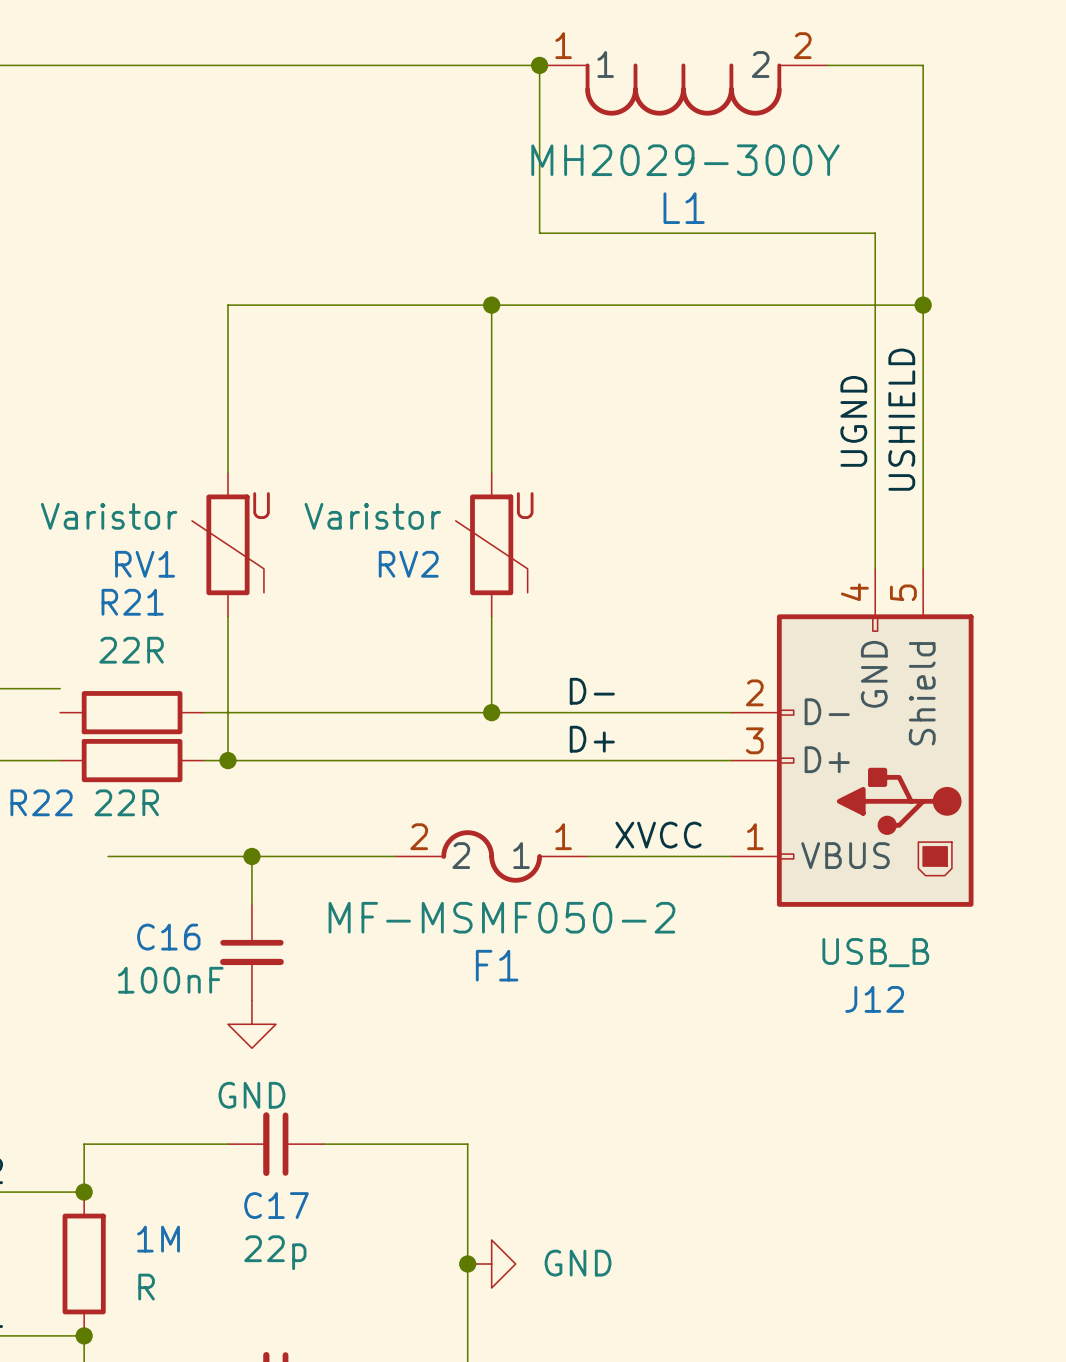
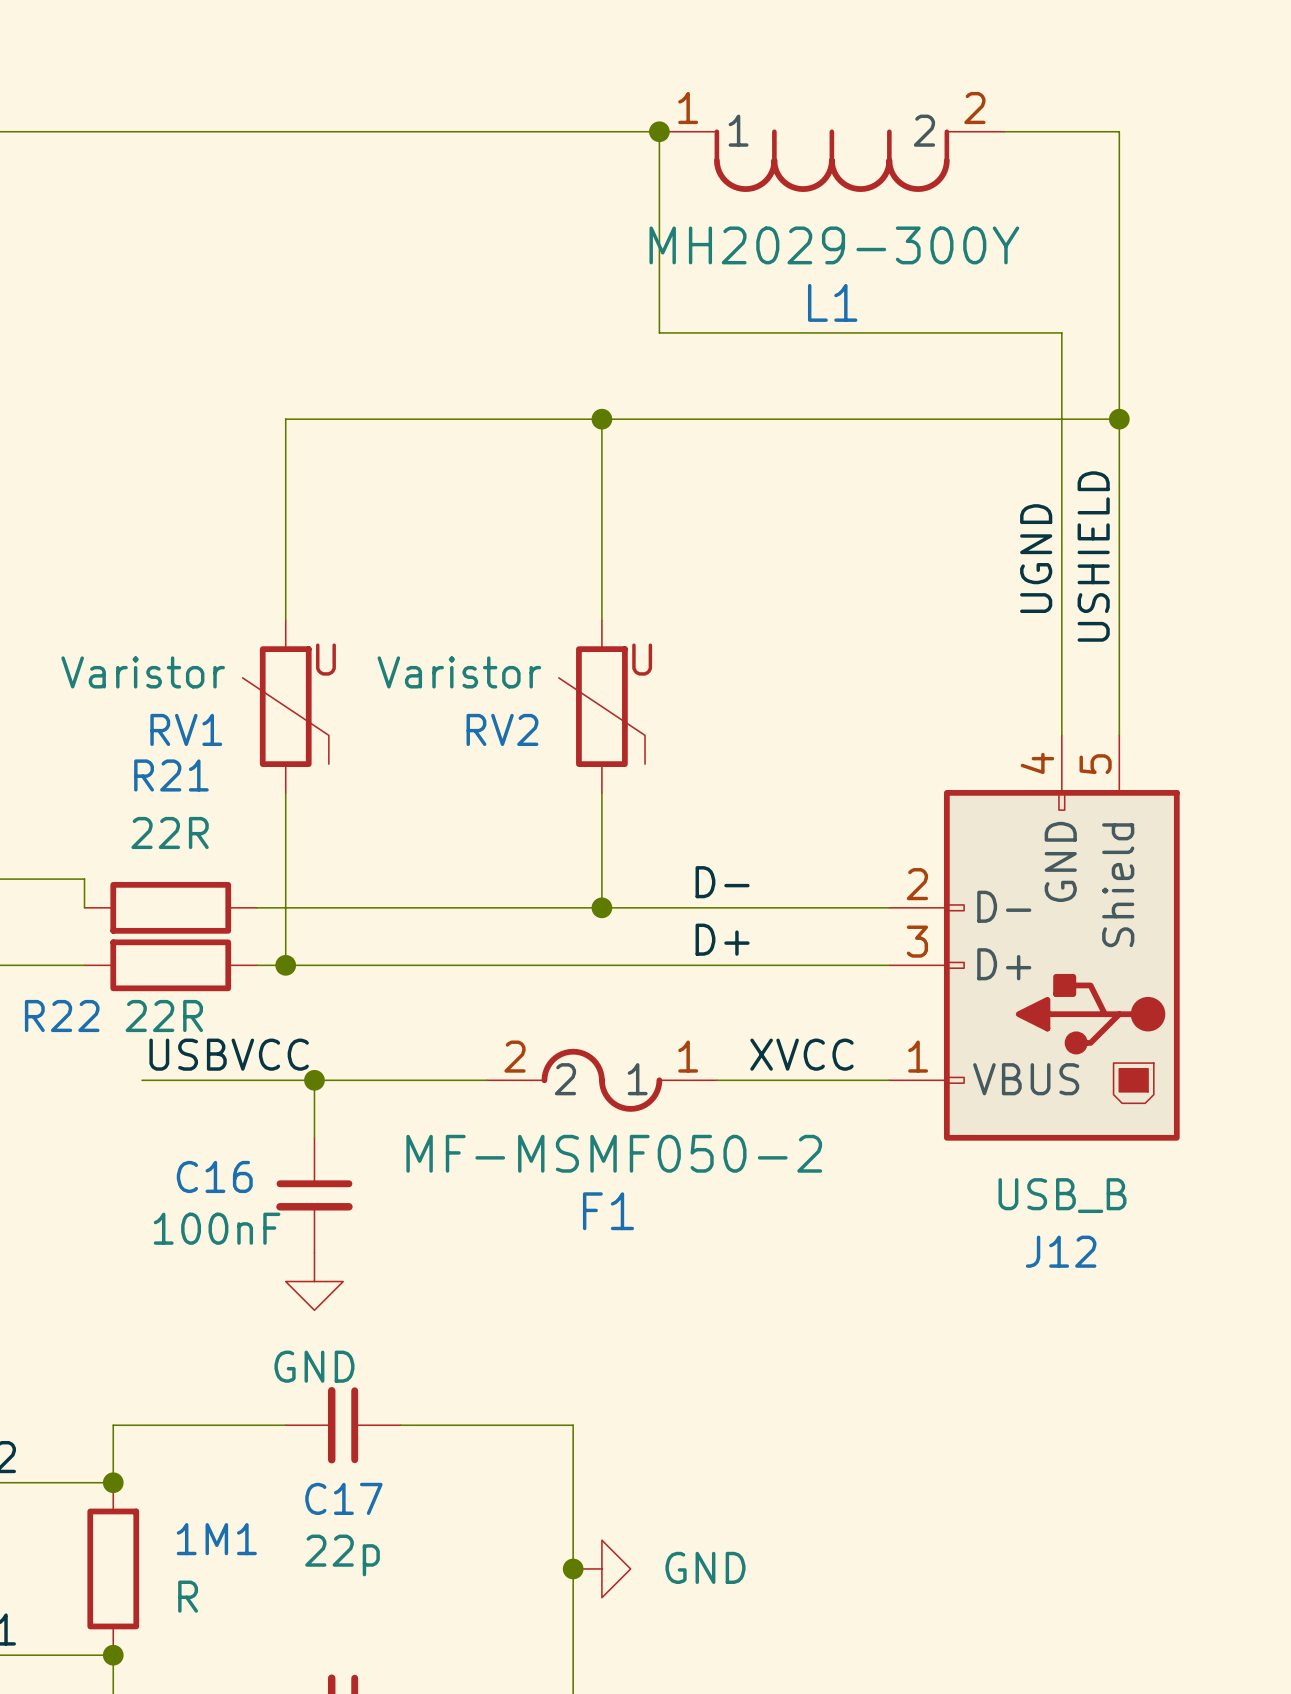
wire: none -> (84, 879) (84, 907)
label: none -> USBVCC (229, 1054)
1M name: 1M (158, 1239) -> 1M1 (216, 1539)

